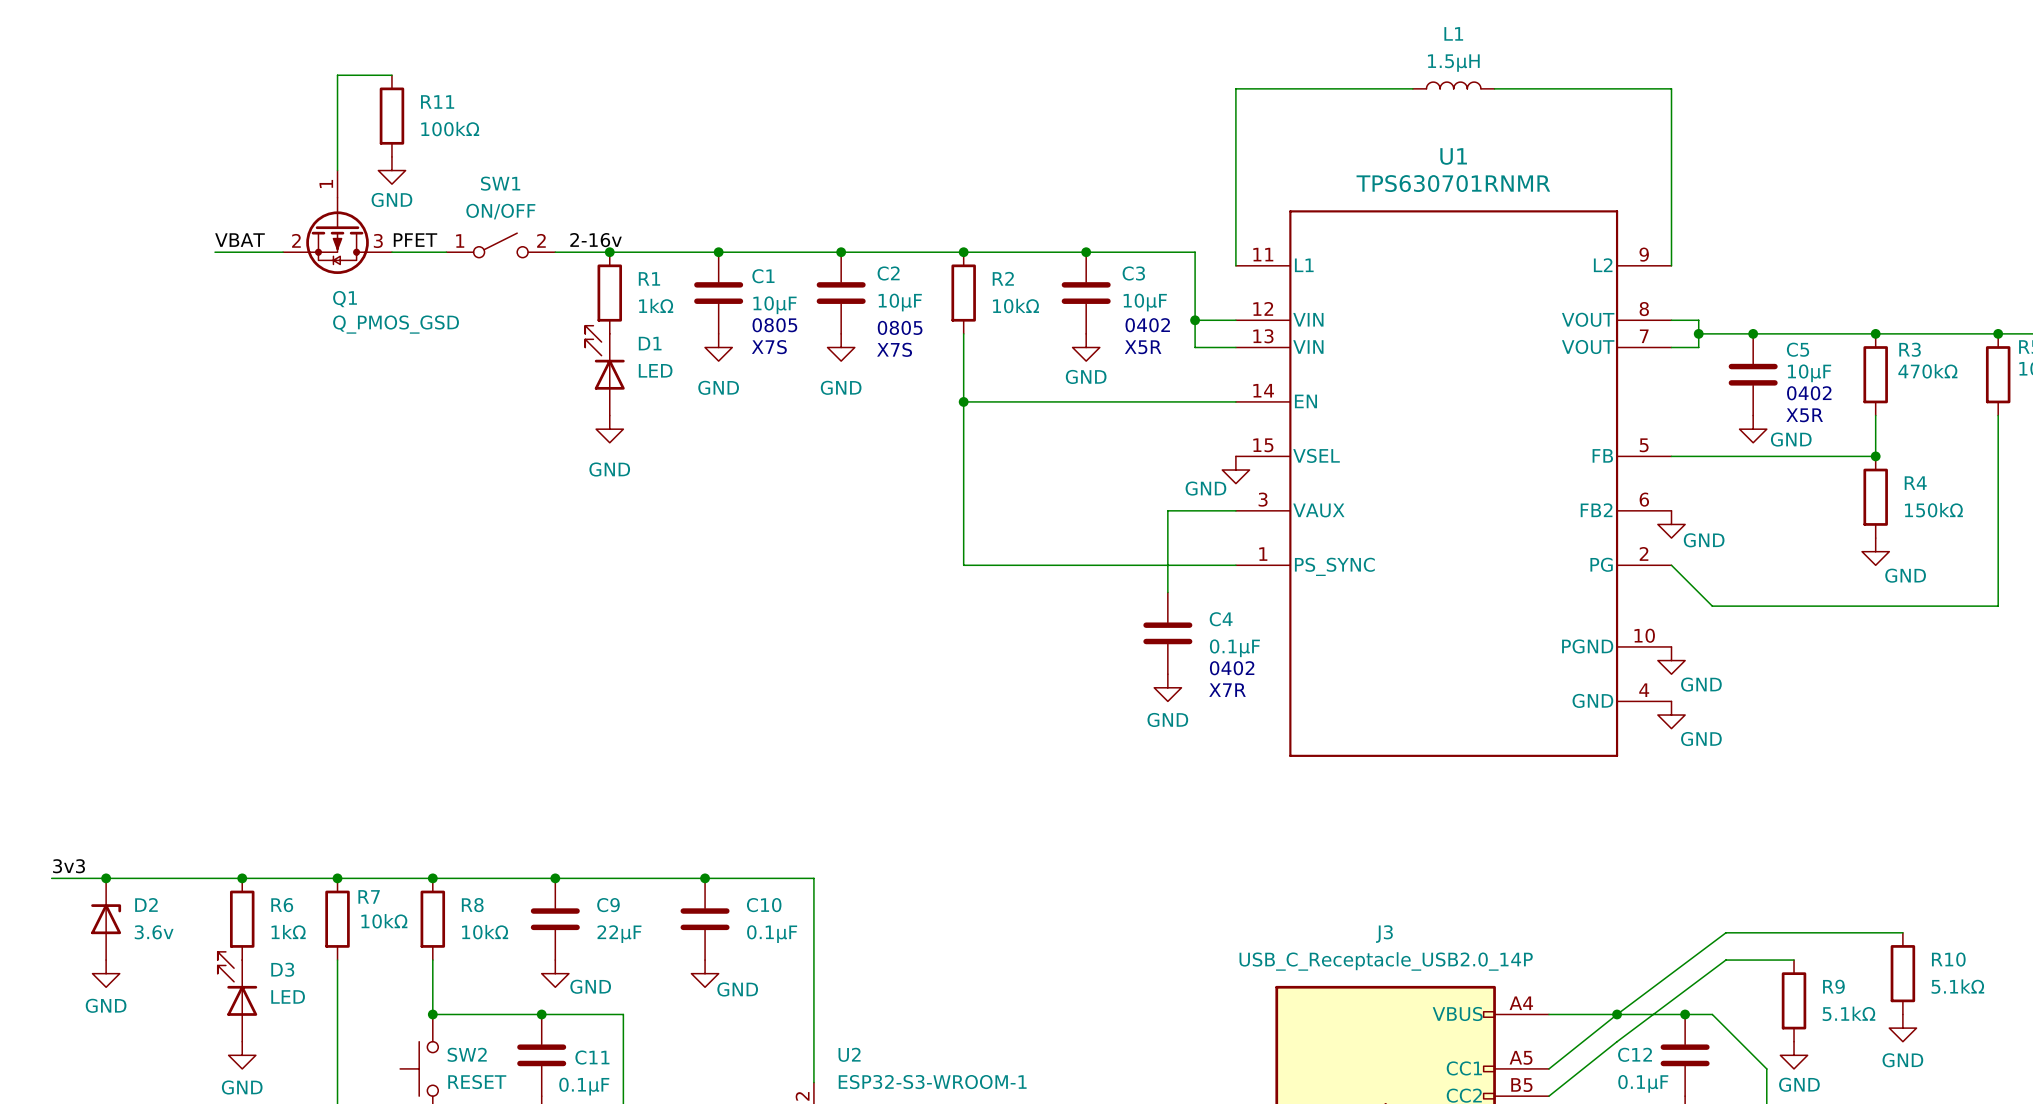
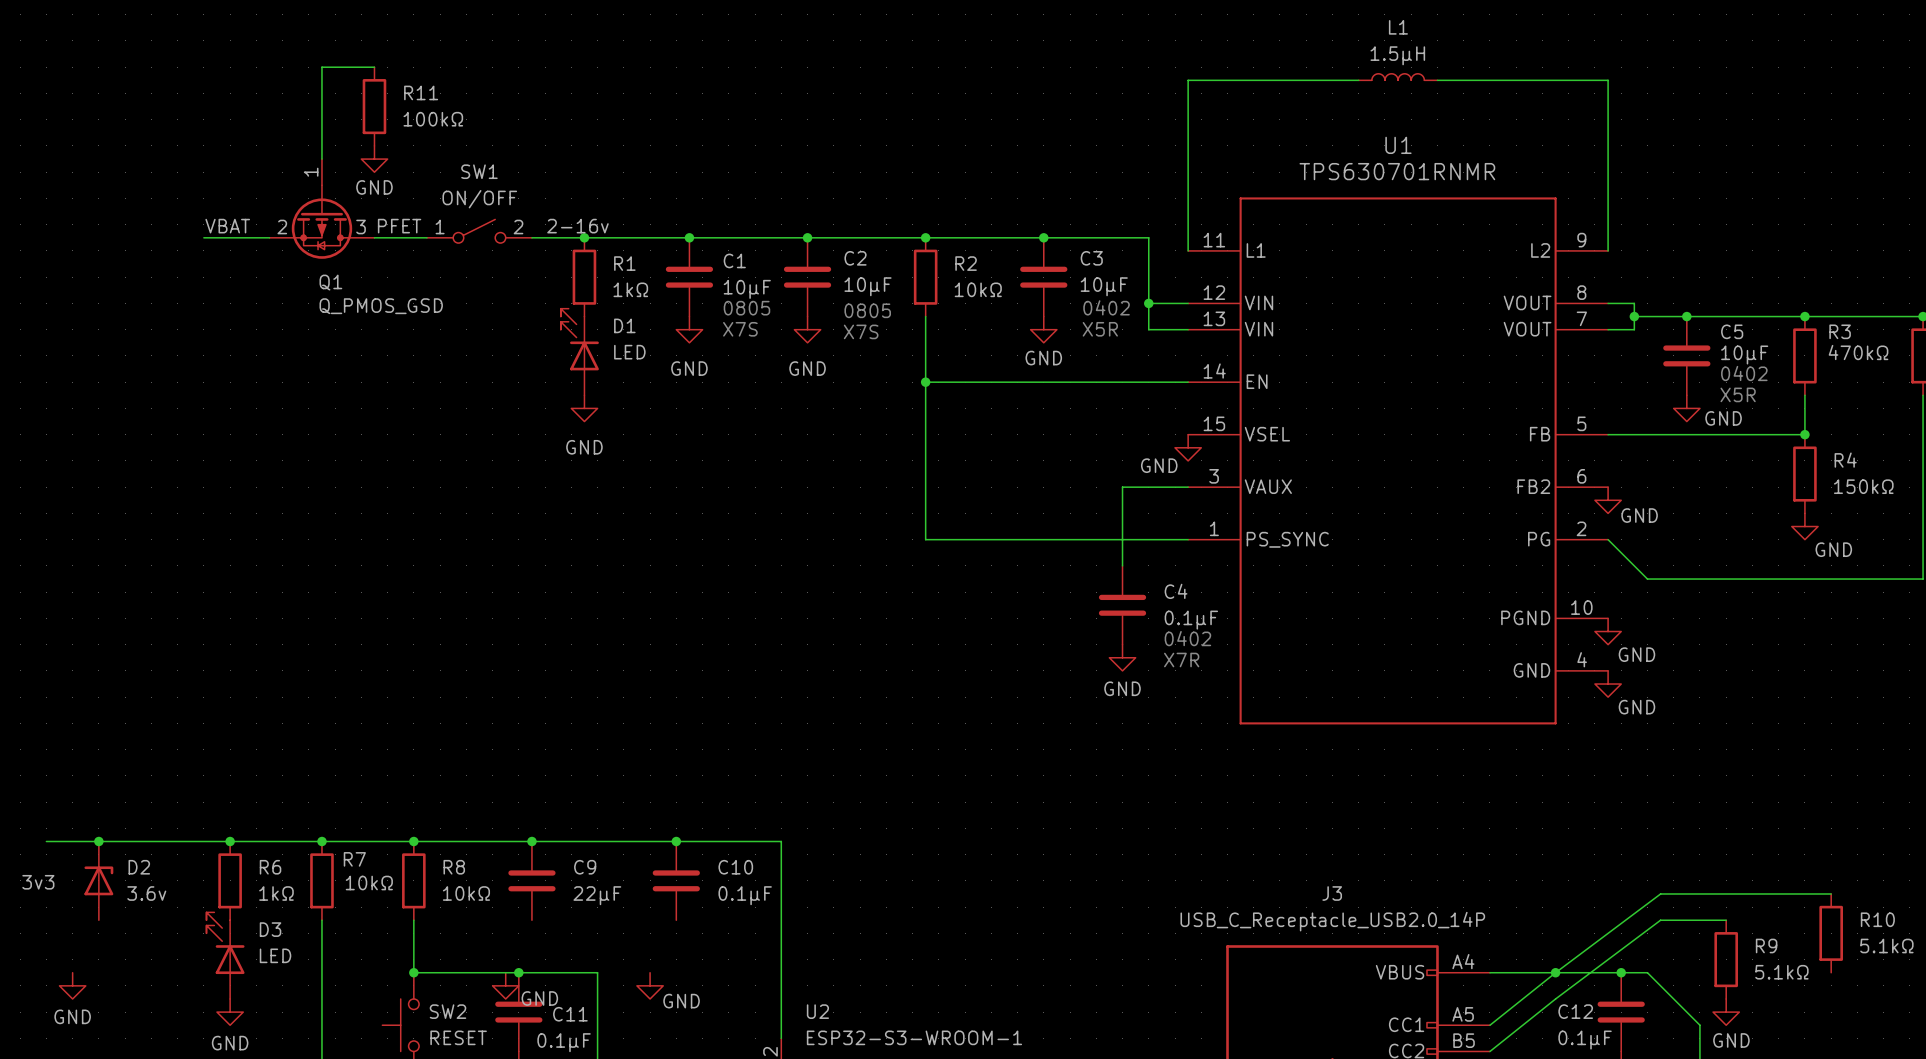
label position: 3v3 (69, 866) -> 3v3 (38, 882)
power symbol position: GND (106, 973) -> GND (72, 985)
power symbol position: GND (555, 973) -> GND (505, 985)
power symbol position: GND (705, 973) -> GND (650, 985)
power symbol: GND (1902, 1028) -> none

